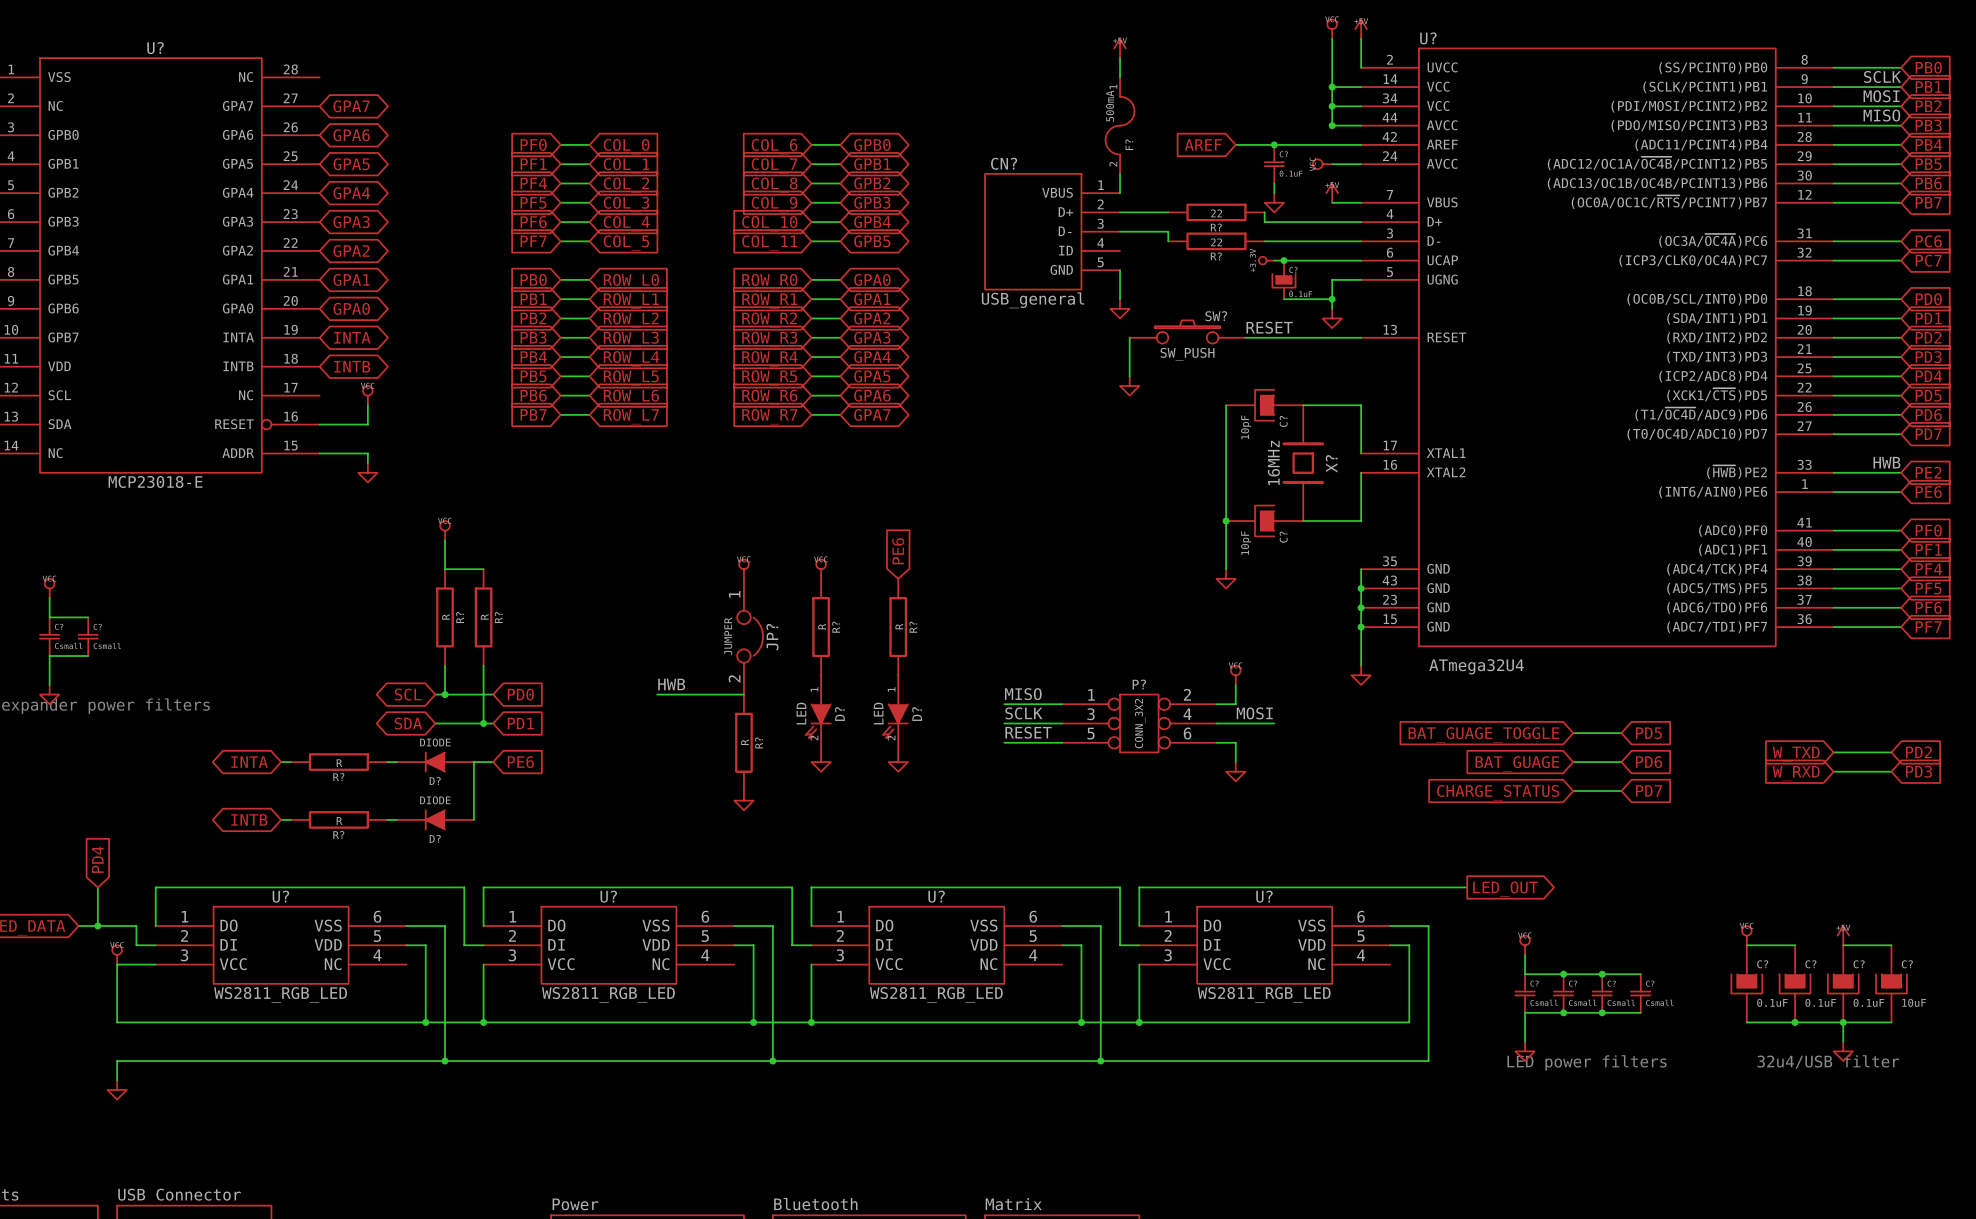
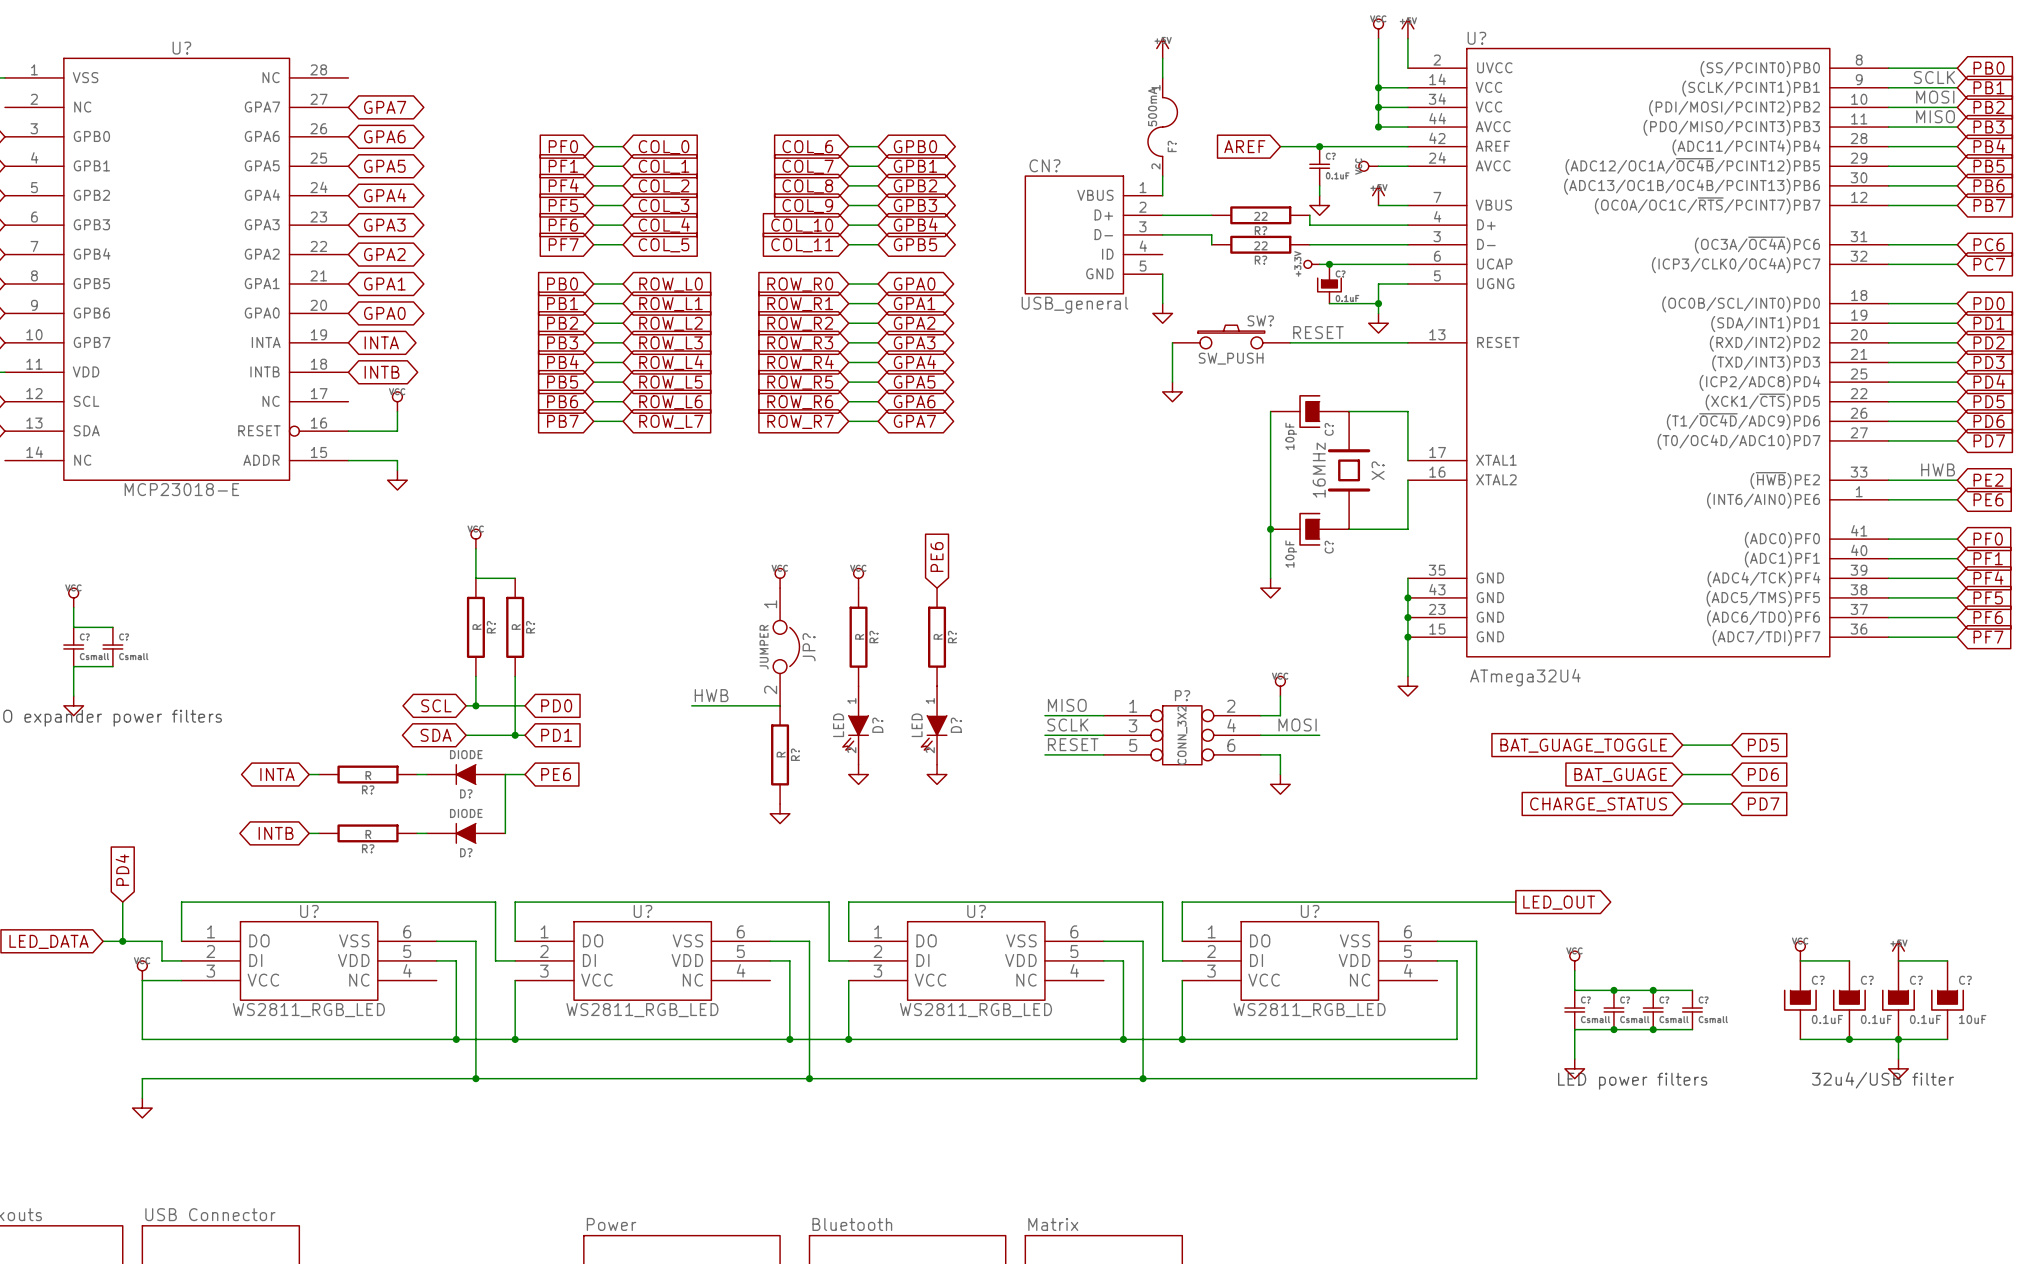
wire: (1573, 733) (1621, 733) -> (1682, 745) (1731, 745)
global label position: PD5 (1648, 733) -> PD5 (1763, 745)
global label position: BAT_GUAGE_TOGGLE (1483, 734) -> BAT_GUAGE_TOGGLE (1583, 745)
wire: (1833, 752) (1891, 752) -> none
global label: PD2 (1918, 752) -> none
global label: W_TXD (1796, 754) -> none
wire: (1573, 762) (1621, 762) -> (1682, 774) (1731, 774)
global label position: PD6 (1649, 762) -> PD6 (1763, 774)
global label position: BAT_GUAGE (1517, 763) -> BAT_GUAGE (1620, 775)
wire: (1833, 771) (1891, 771) -> none
global label: PD3 (1919, 771) -> none
global label: W_RXD (1796, 773) -> none
wire: (1573, 791) (1621, 791) -> (1682, 803) (1731, 803)
global label position: PD7 (1648, 791) -> PD7 (1763, 803)
global label position: CHARGE_STATUS (1498, 792) -> CHARGE_STATUS (1598, 804)

